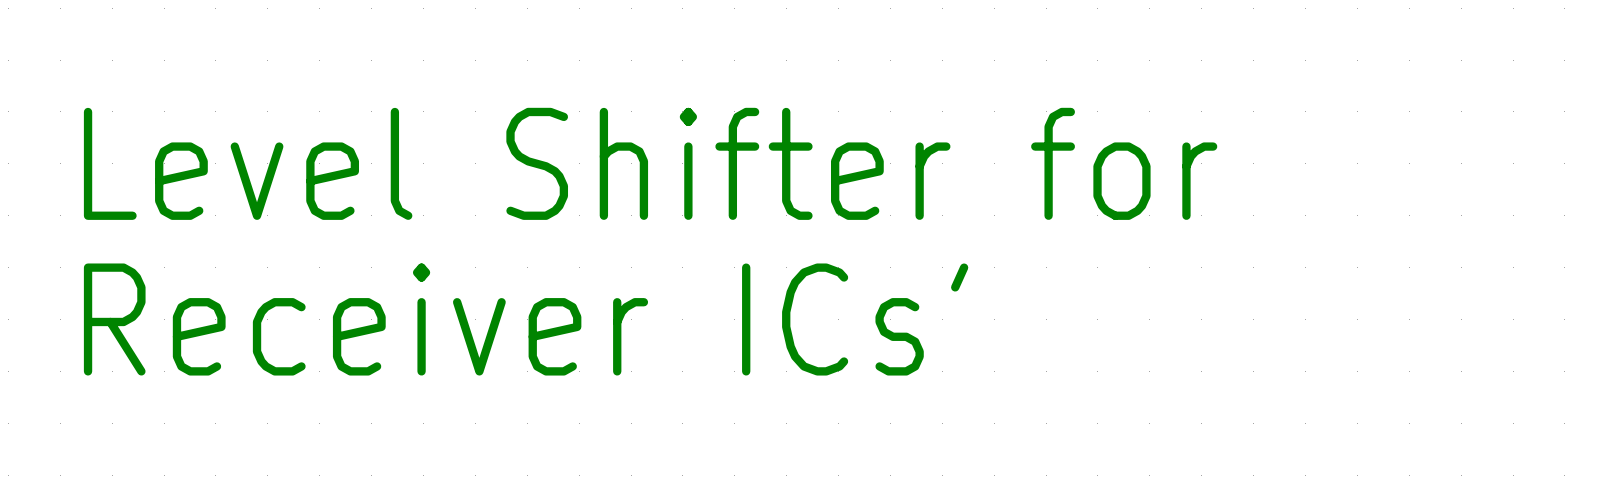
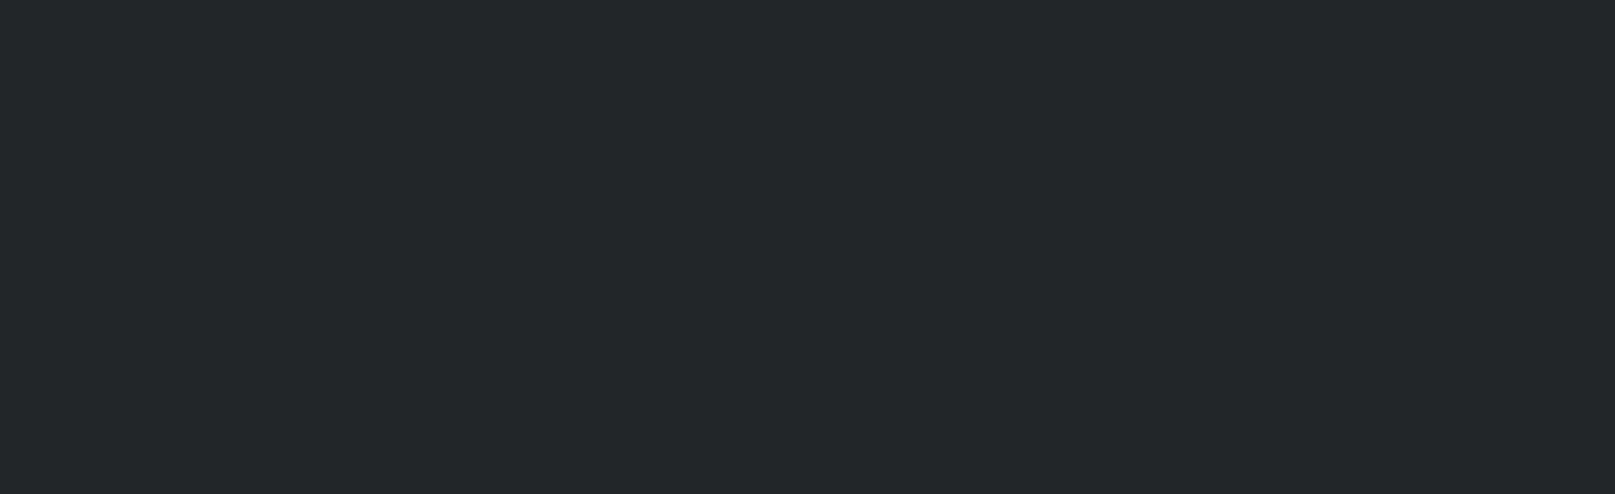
text: Level Shifter for (650, 163) -> none
text: Receiver ICs' (526, 319) -> none

